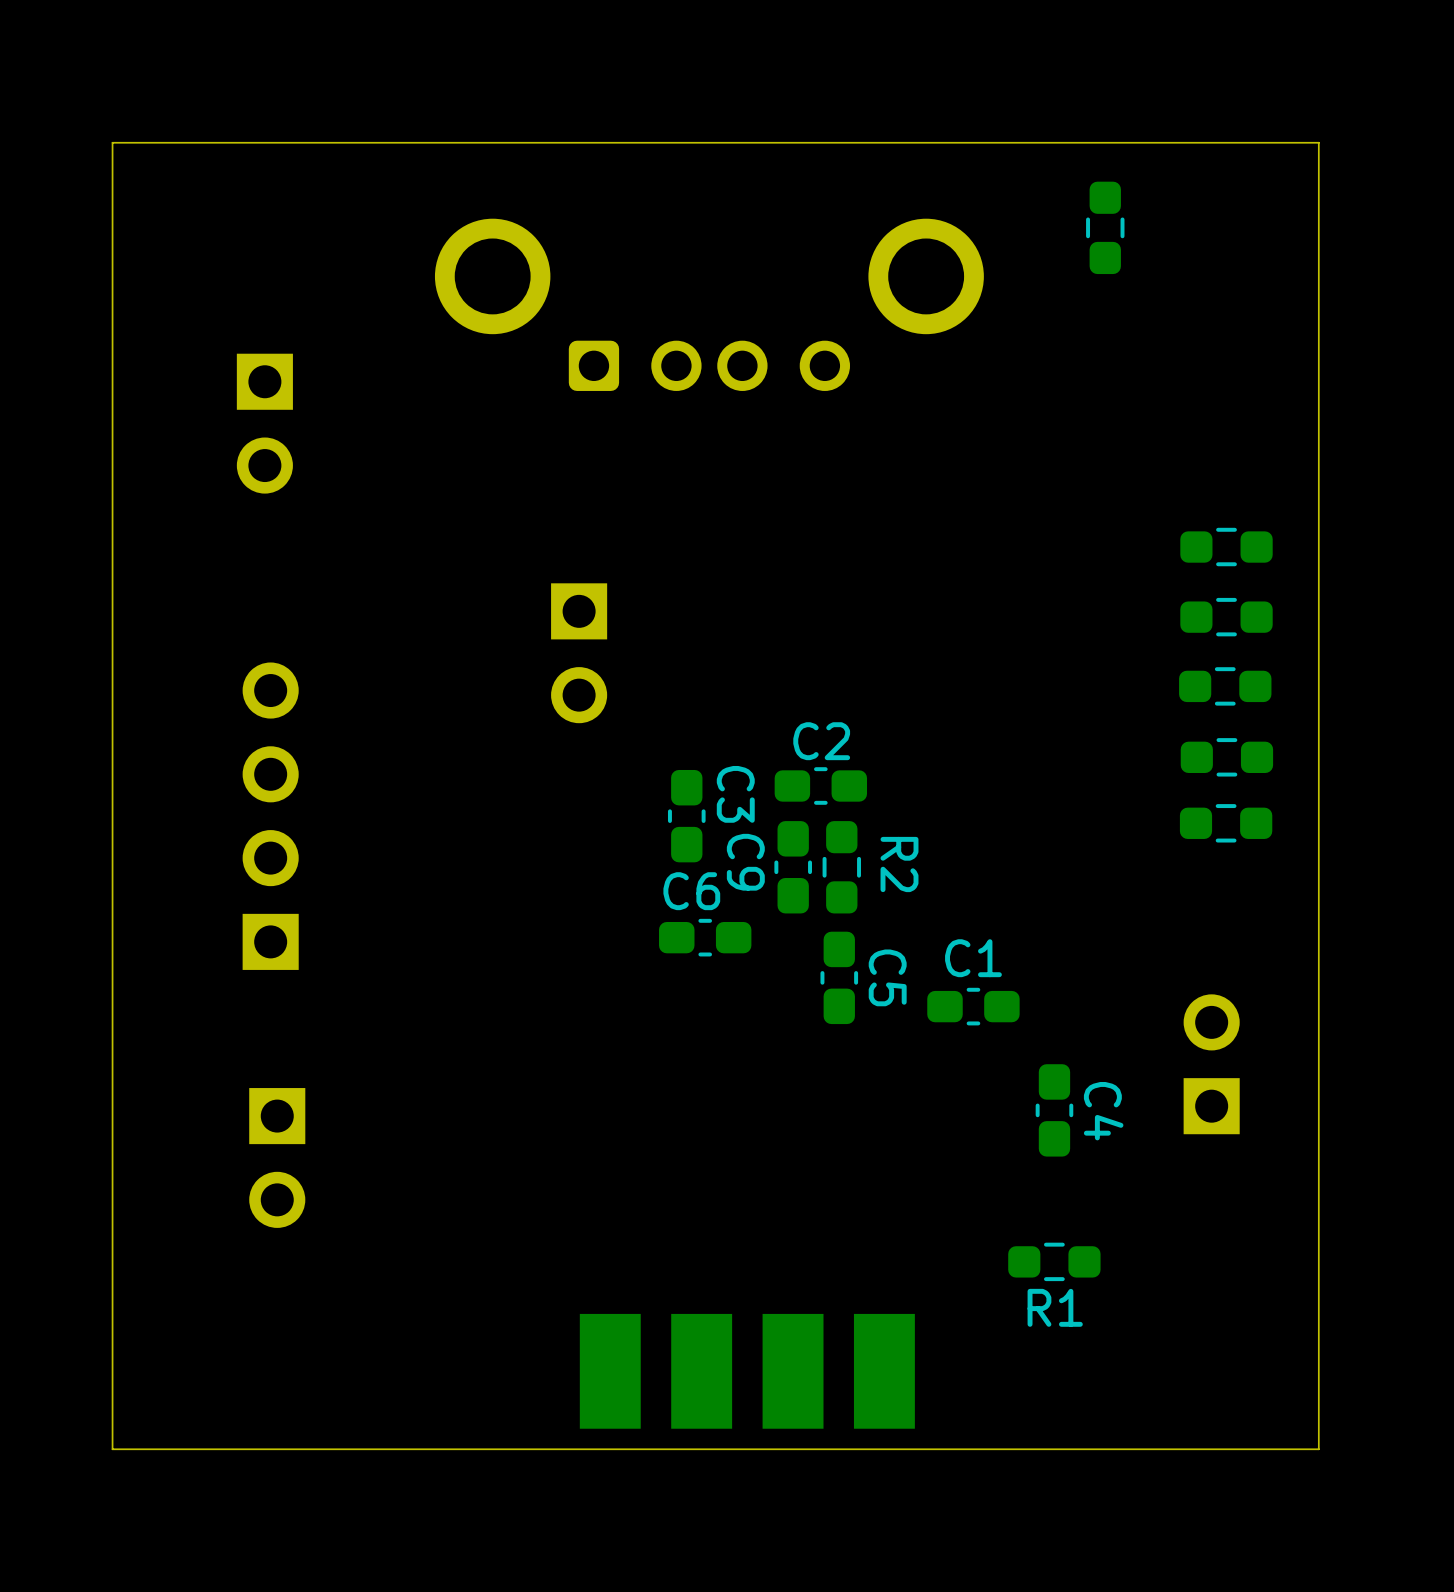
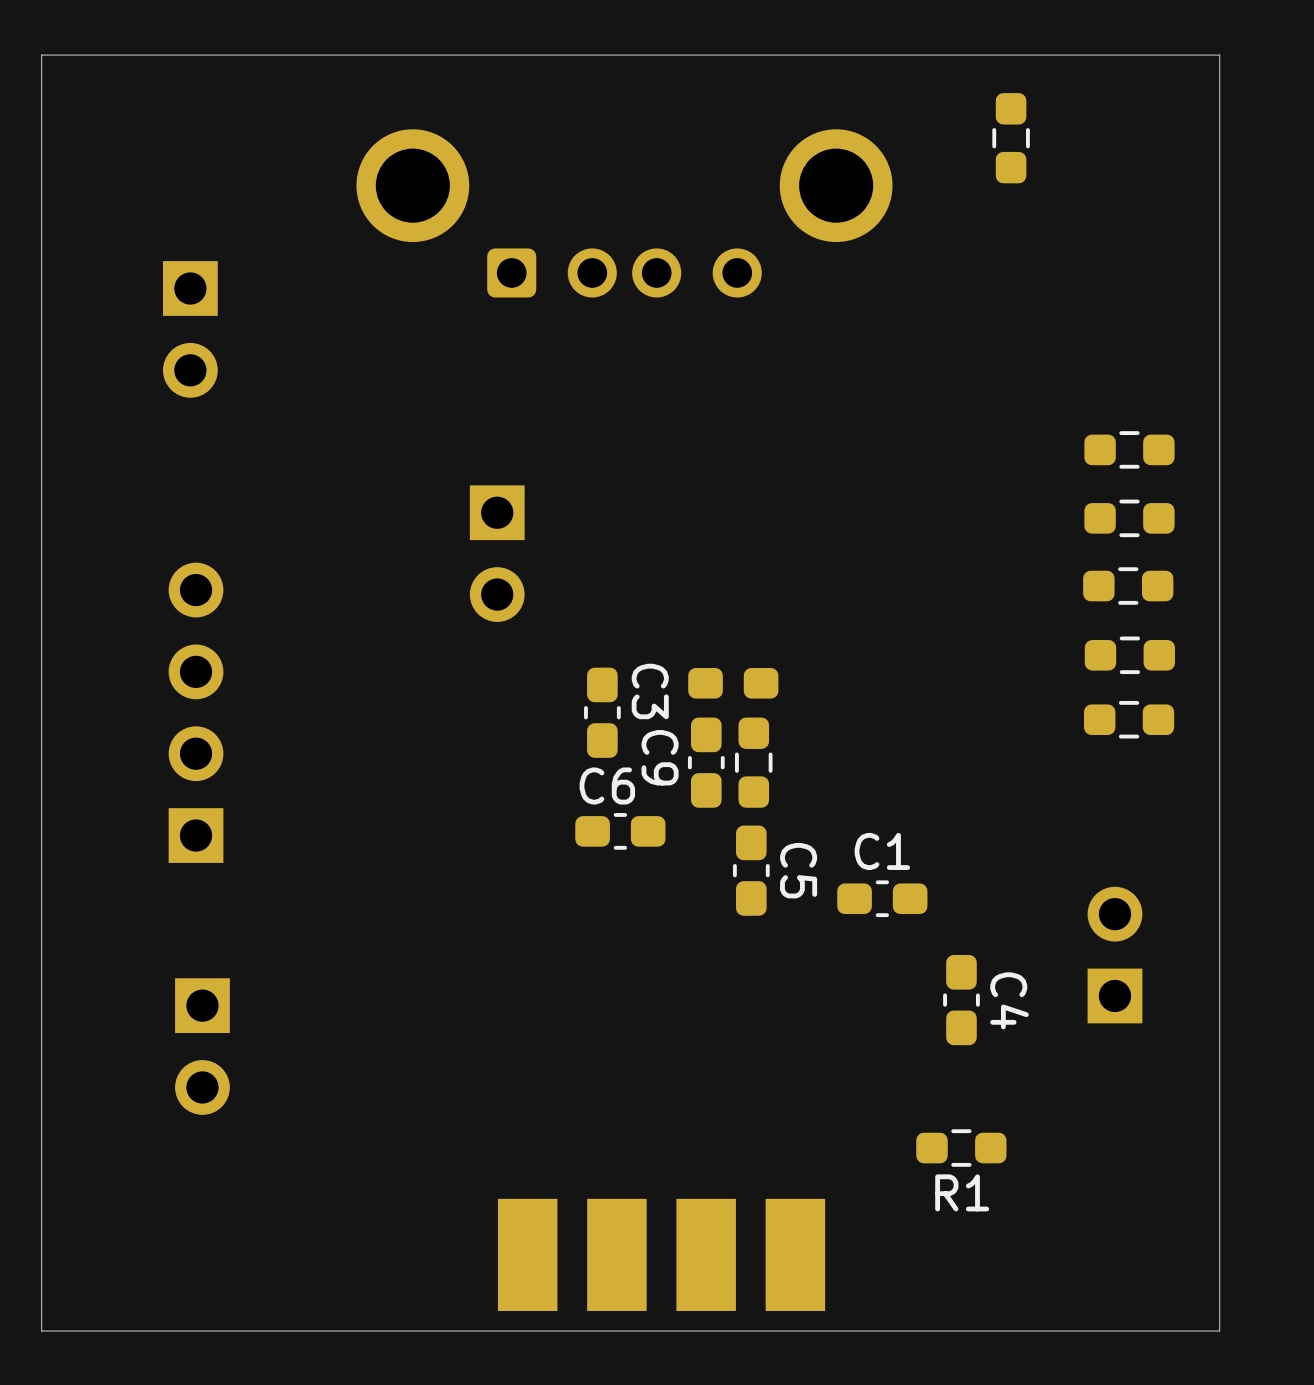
C2: (820, 785) -> none
R2 name: R2 (899, 864) -> none

